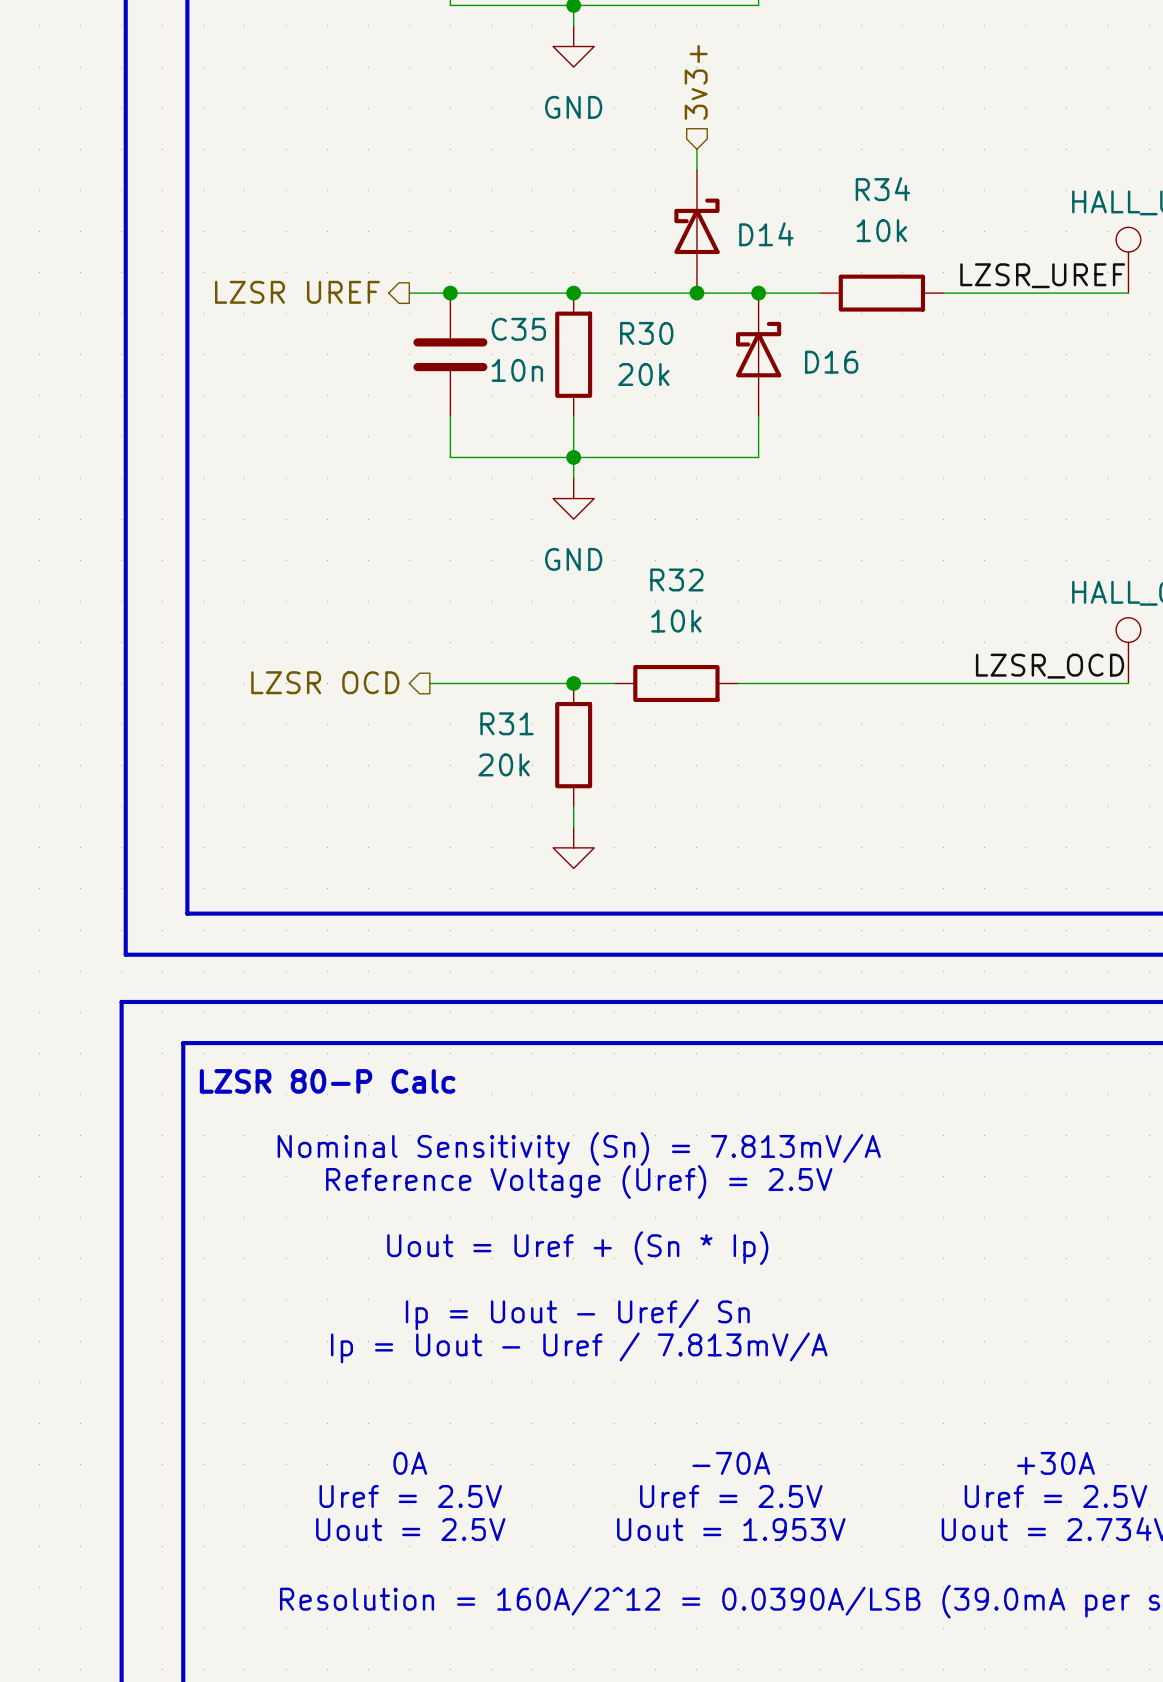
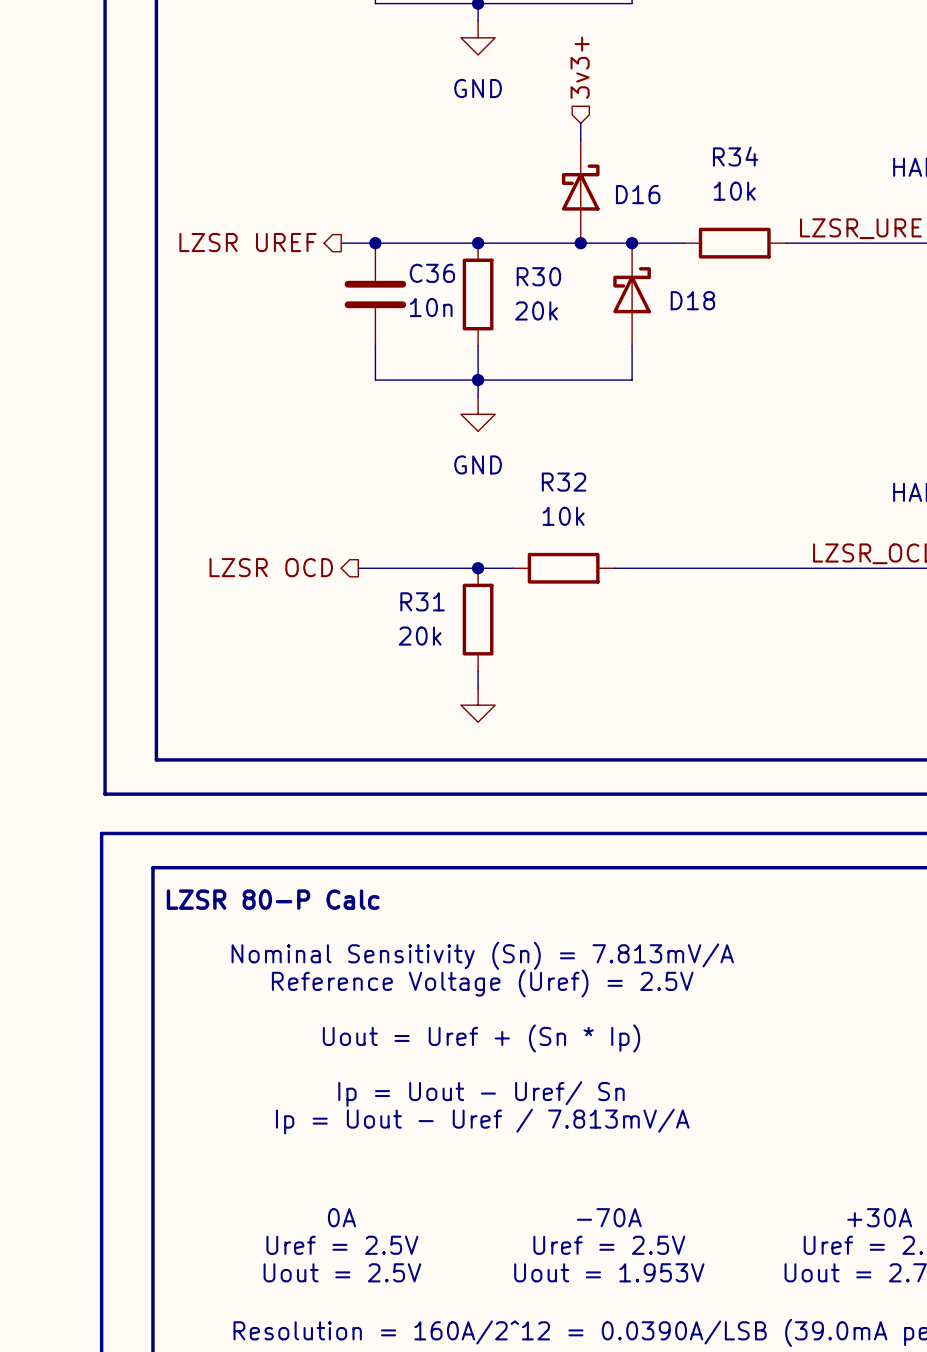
D14 name: D14 (766, 234) -> D16 (638, 194)
C35 name: C35 (518, 329) -> C36 (432, 273)
D16 name: D16 (831, 362) -> D18 (692, 300)

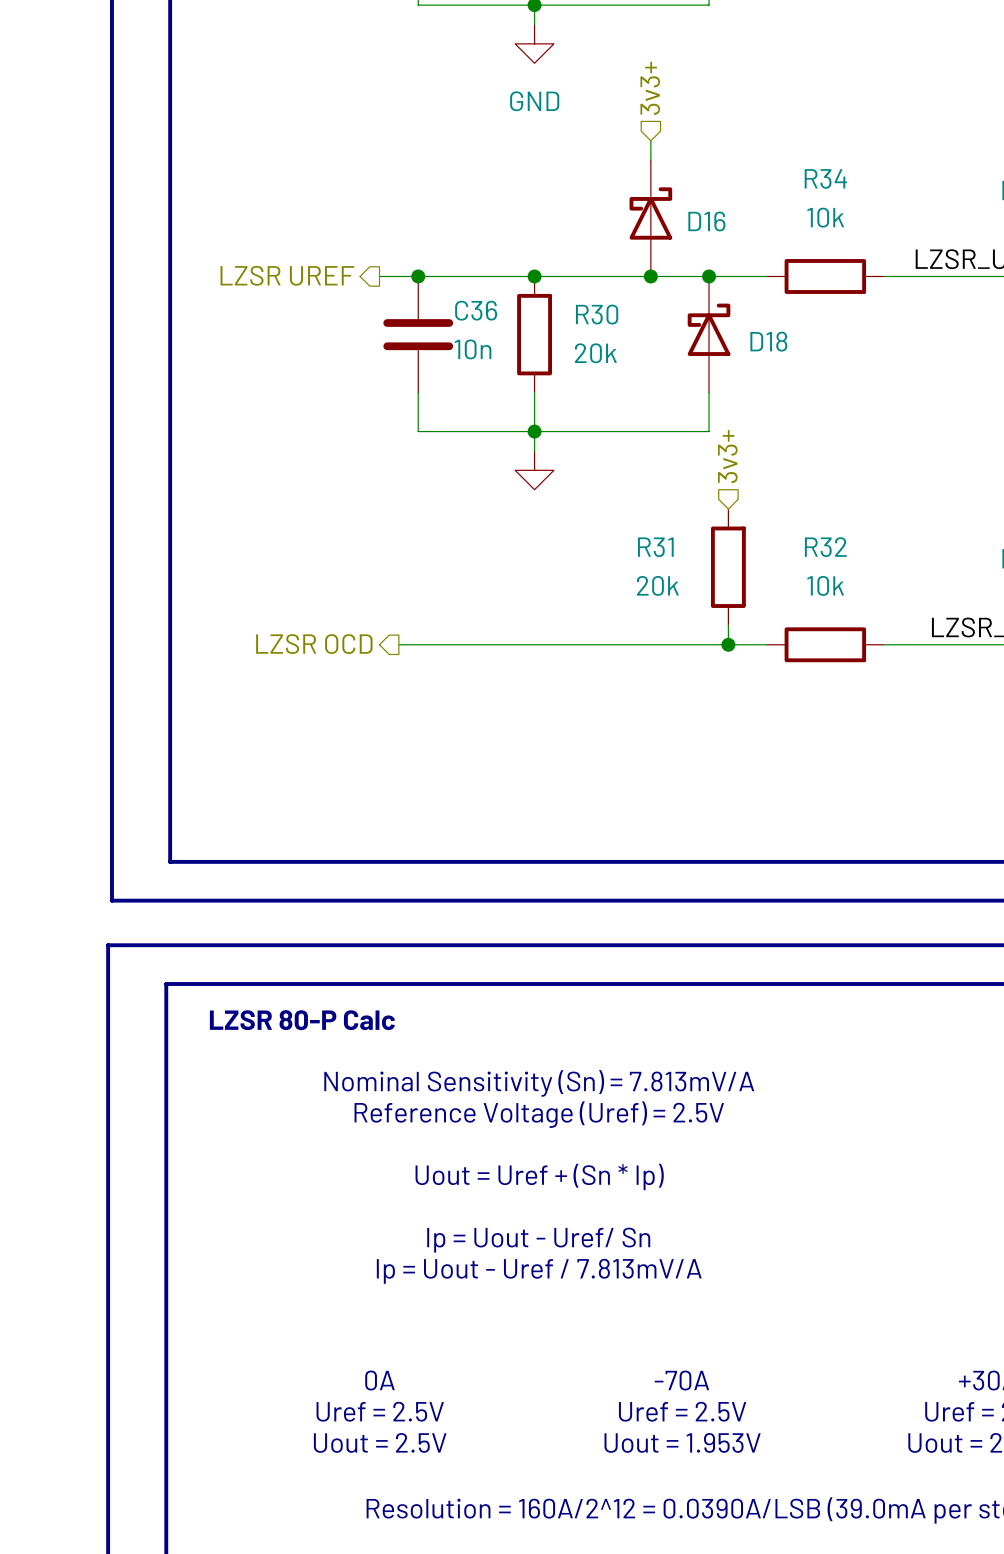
hierarchical label: none -> 3v3+ (727, 456)
power symbol text: GND (478, 464) -> none
junction: (478, 568) -> none
R32 position: (563, 568) -> (825, 644)
junction: none -> (728, 644)
wire: (683, 568) (786, 568) -> (573, 644) (689, 644)
R31 position: (478, 619) -> (728, 567)
wire: (478, 670) (478, 688) -> (728, 625) (728, 644)
power symbol: (478, 705) -> none

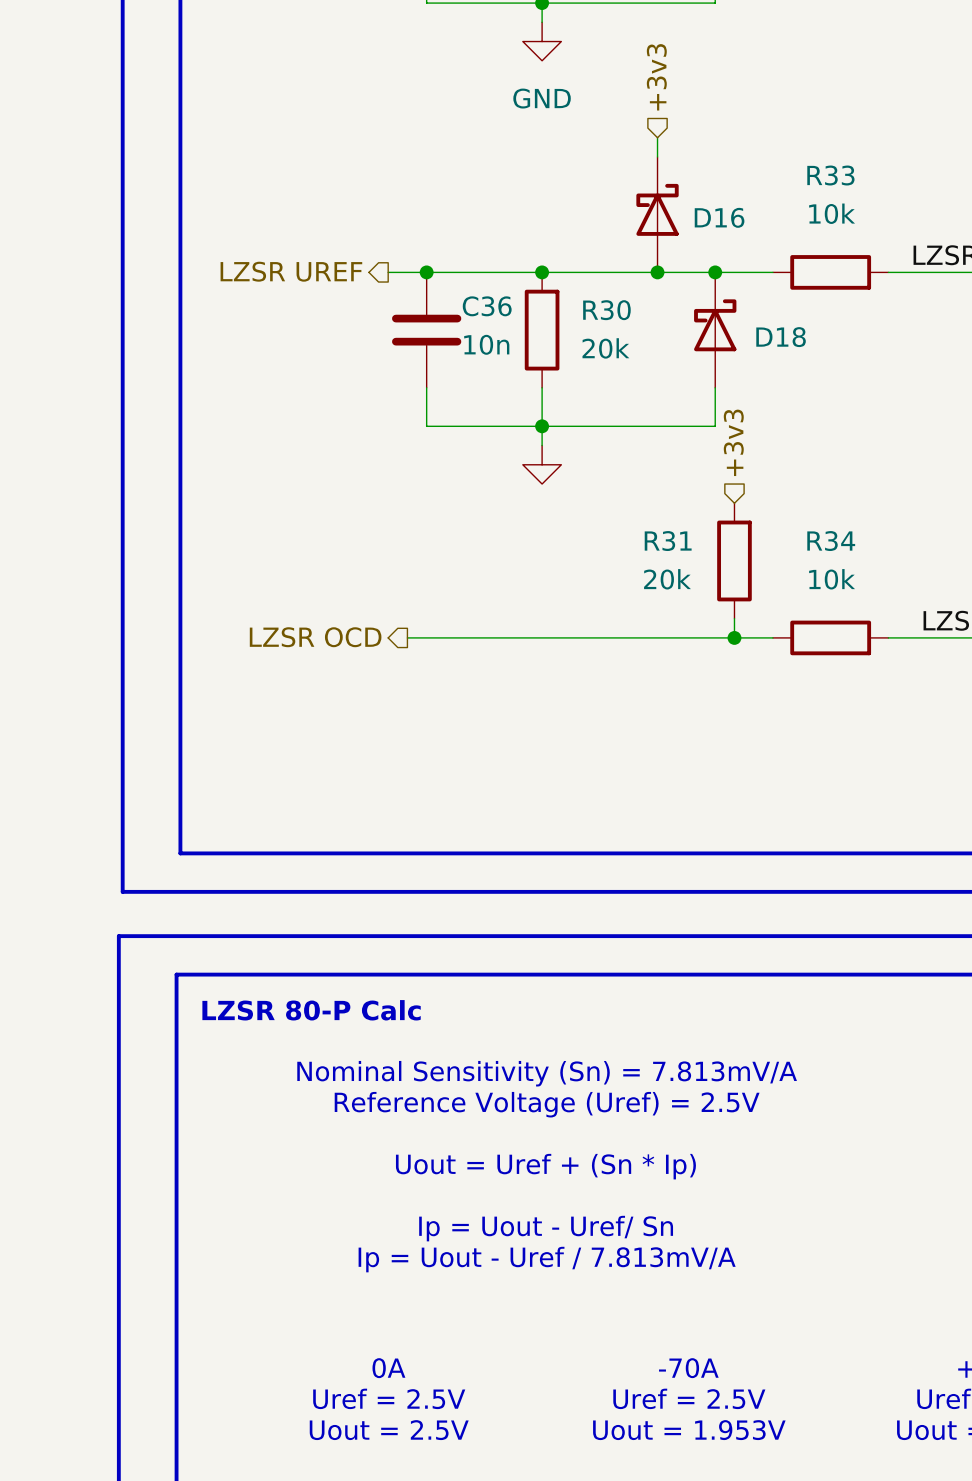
hierarchical label: 3v3+ (650, 88) -> +3v3 (656, 77)
R34 name: R34 (825, 178) -> R33 (830, 175)
hierarchical label: 3v3+ (727, 456) -> +3v3 (733, 442)
R32 name: R32 (825, 547) -> R34 (831, 541)

